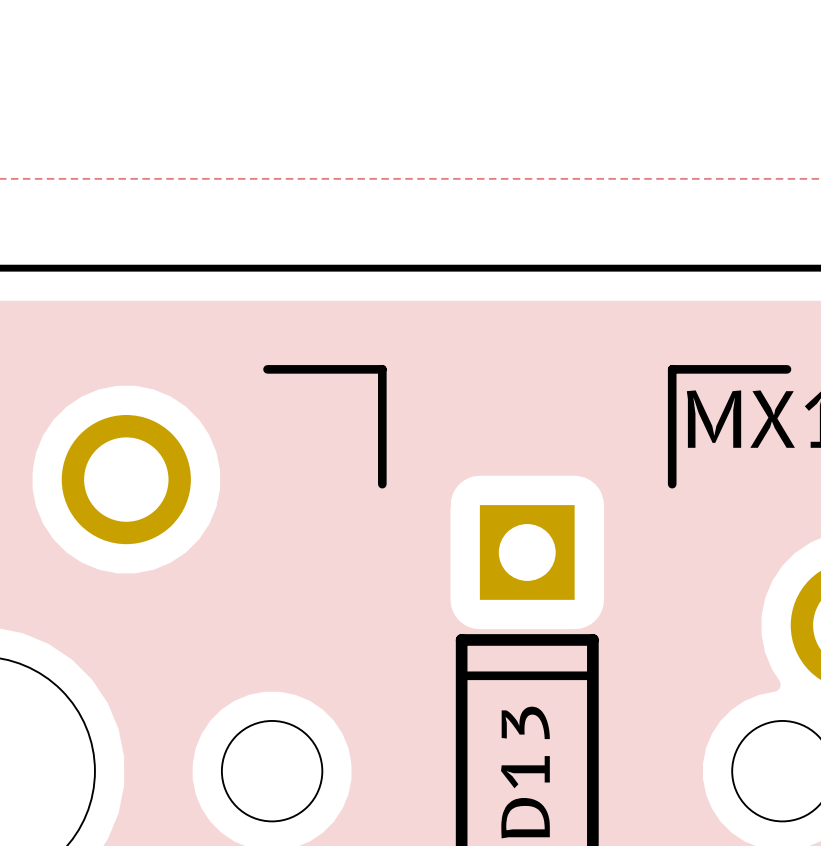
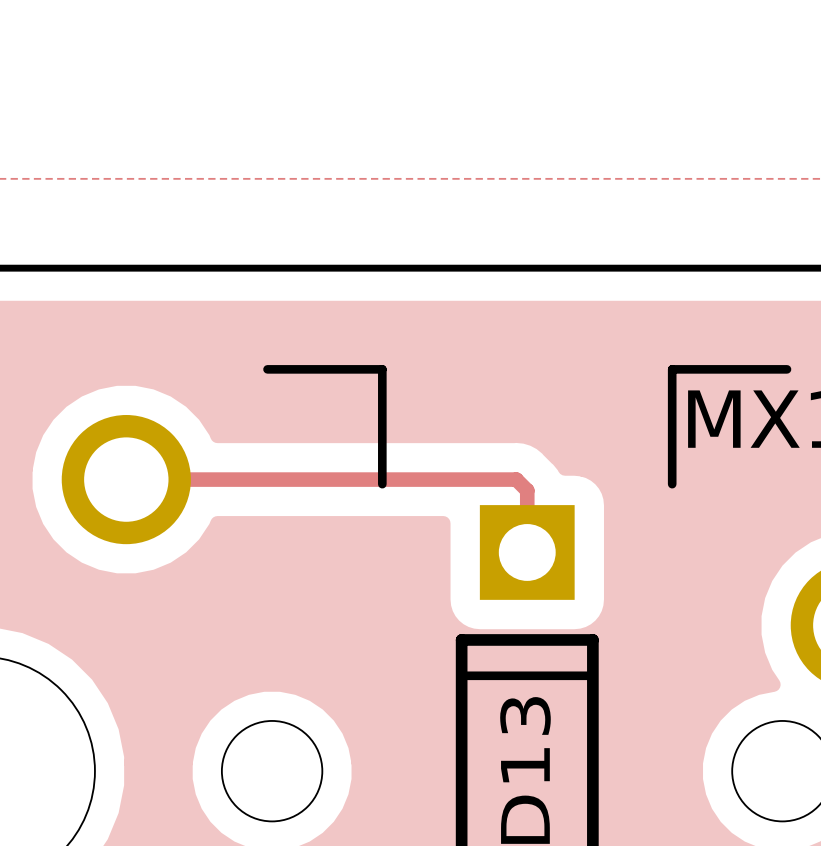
track: none -> (126, 479) (516, 479) (527, 490) (527, 552)

